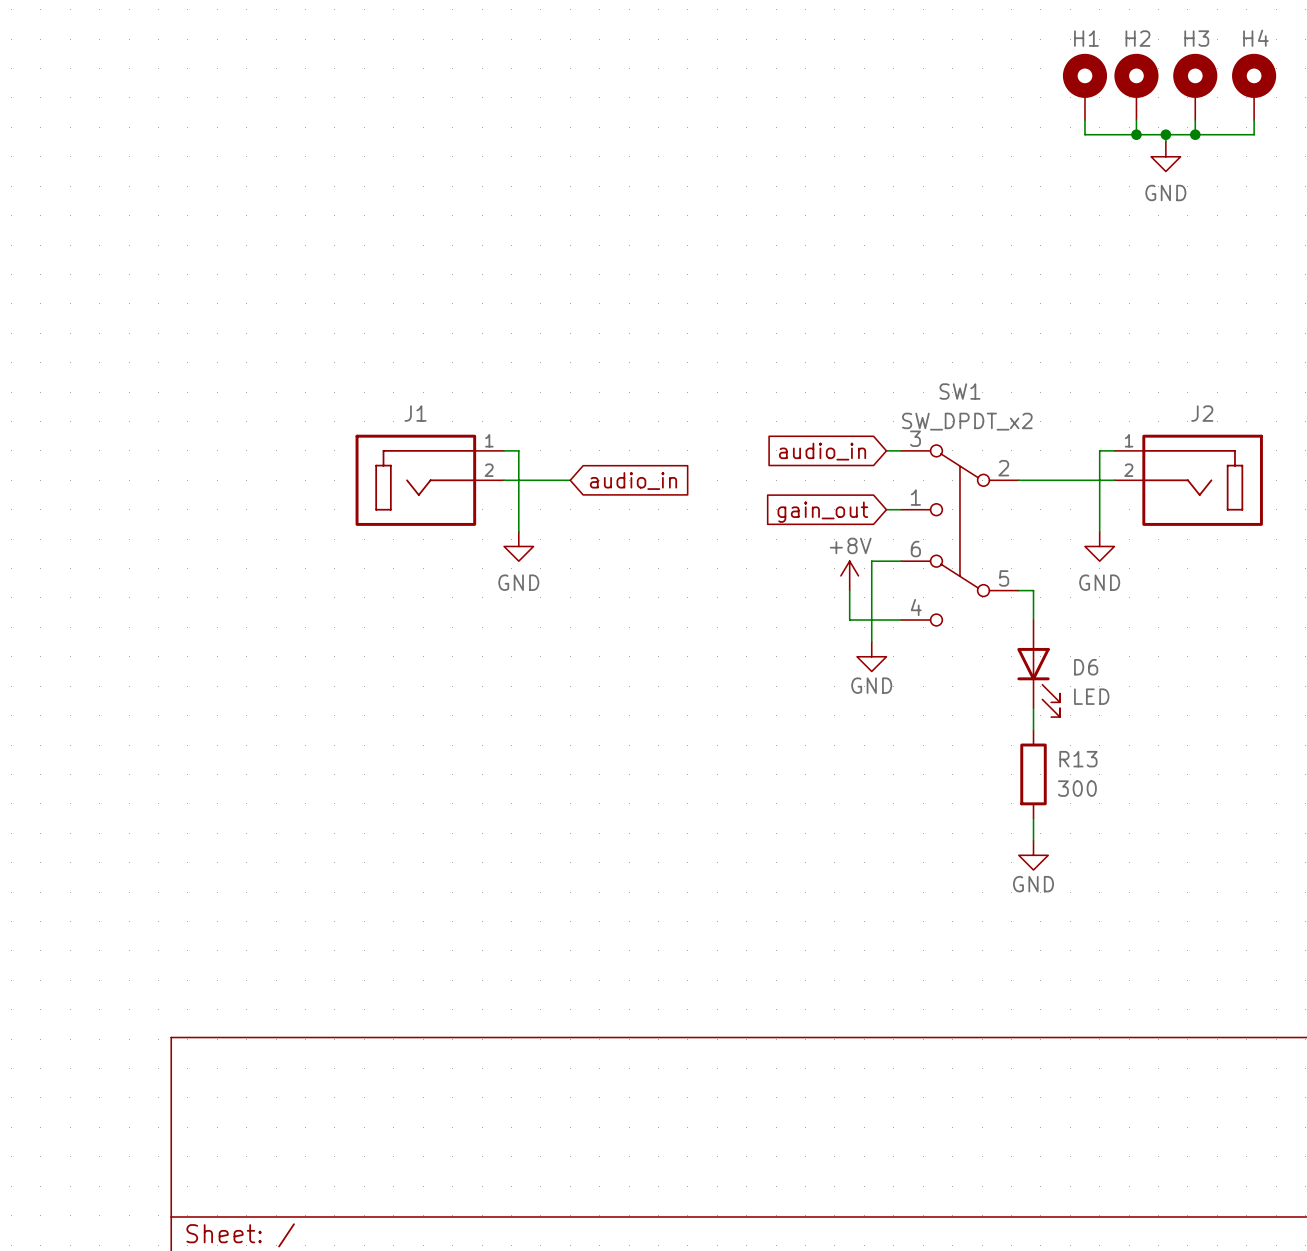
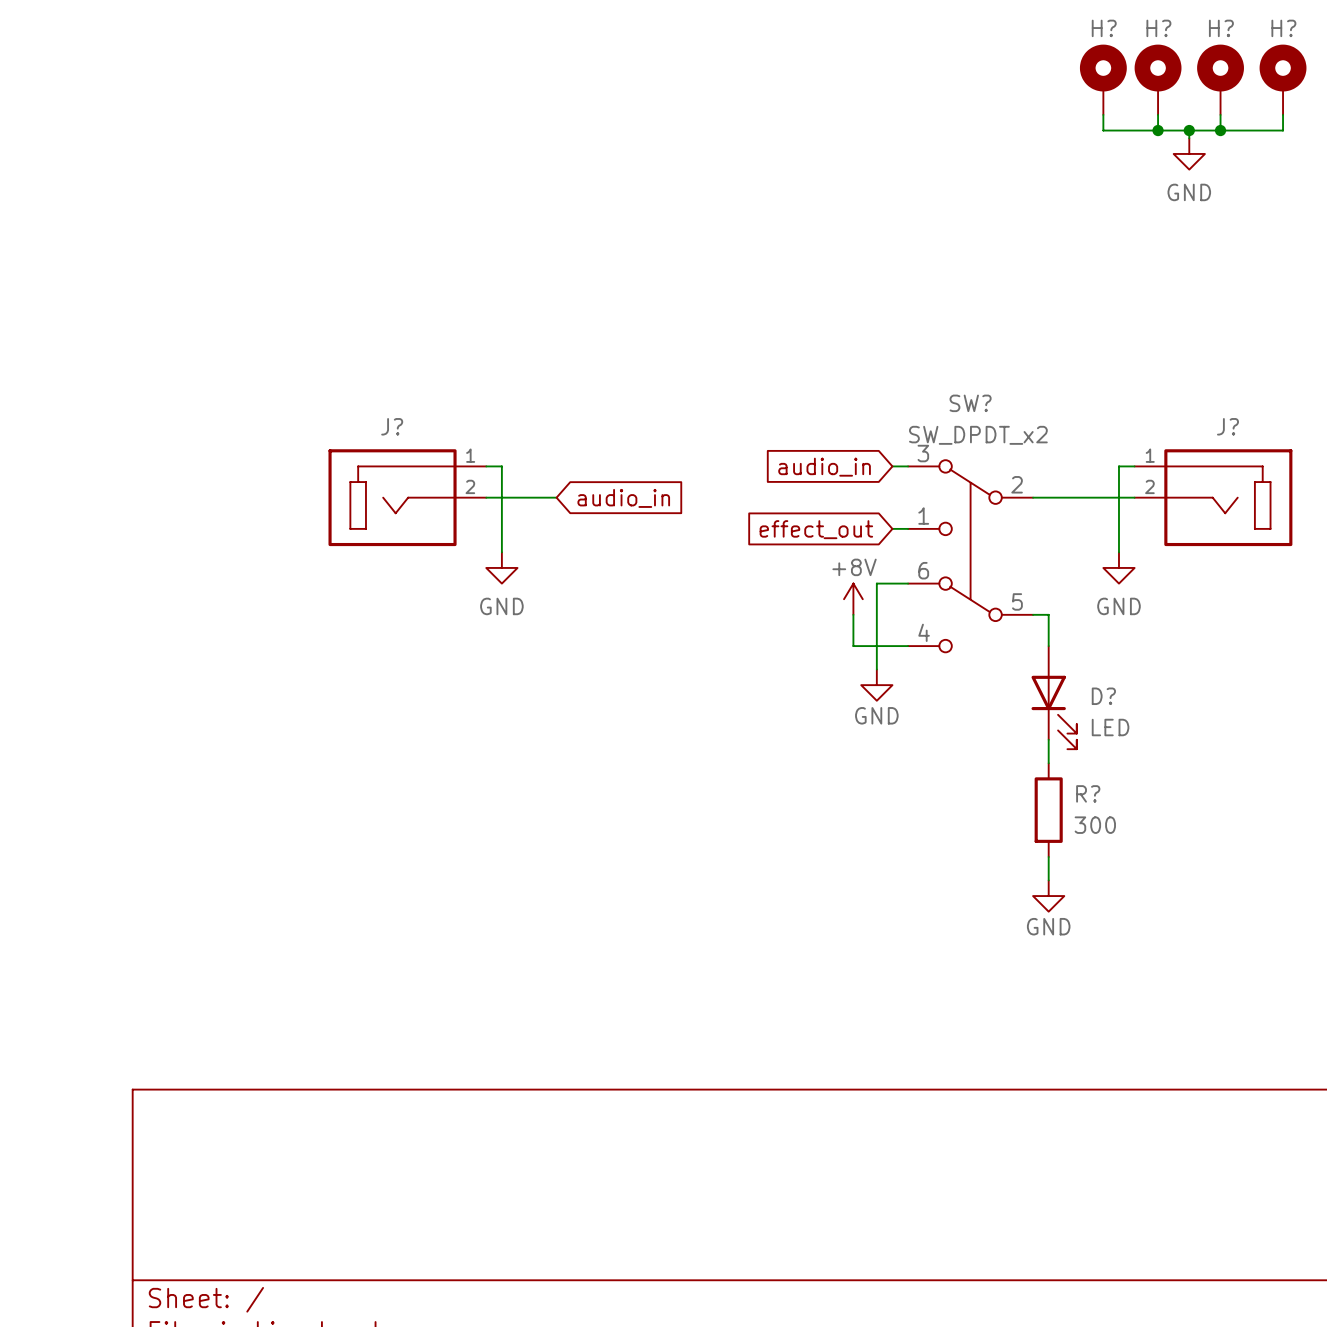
H1 name: H1 (1086, 38) -> H? (1104, 28)
H2 name: H2 (1137, 38) -> H? (1158, 28)
H3 name: H3 (1196, 38) -> H? (1221, 28)
H4 name: H4 (1255, 38) -> H? (1283, 28)
SW1 name: SW1 (959, 391) -> SW? (970, 403)
J1 name: J1 (415, 413) -> J? (392, 426)
J2 name: J2 (1202, 413) -> J? (1227, 426)
global label: gain_out (822, 512) -> effect_out (816, 529)
D6 name: D6 (1086, 667) -> D? (1103, 696)
R13 name: R13 (1078, 759) -> R? (1088, 793)

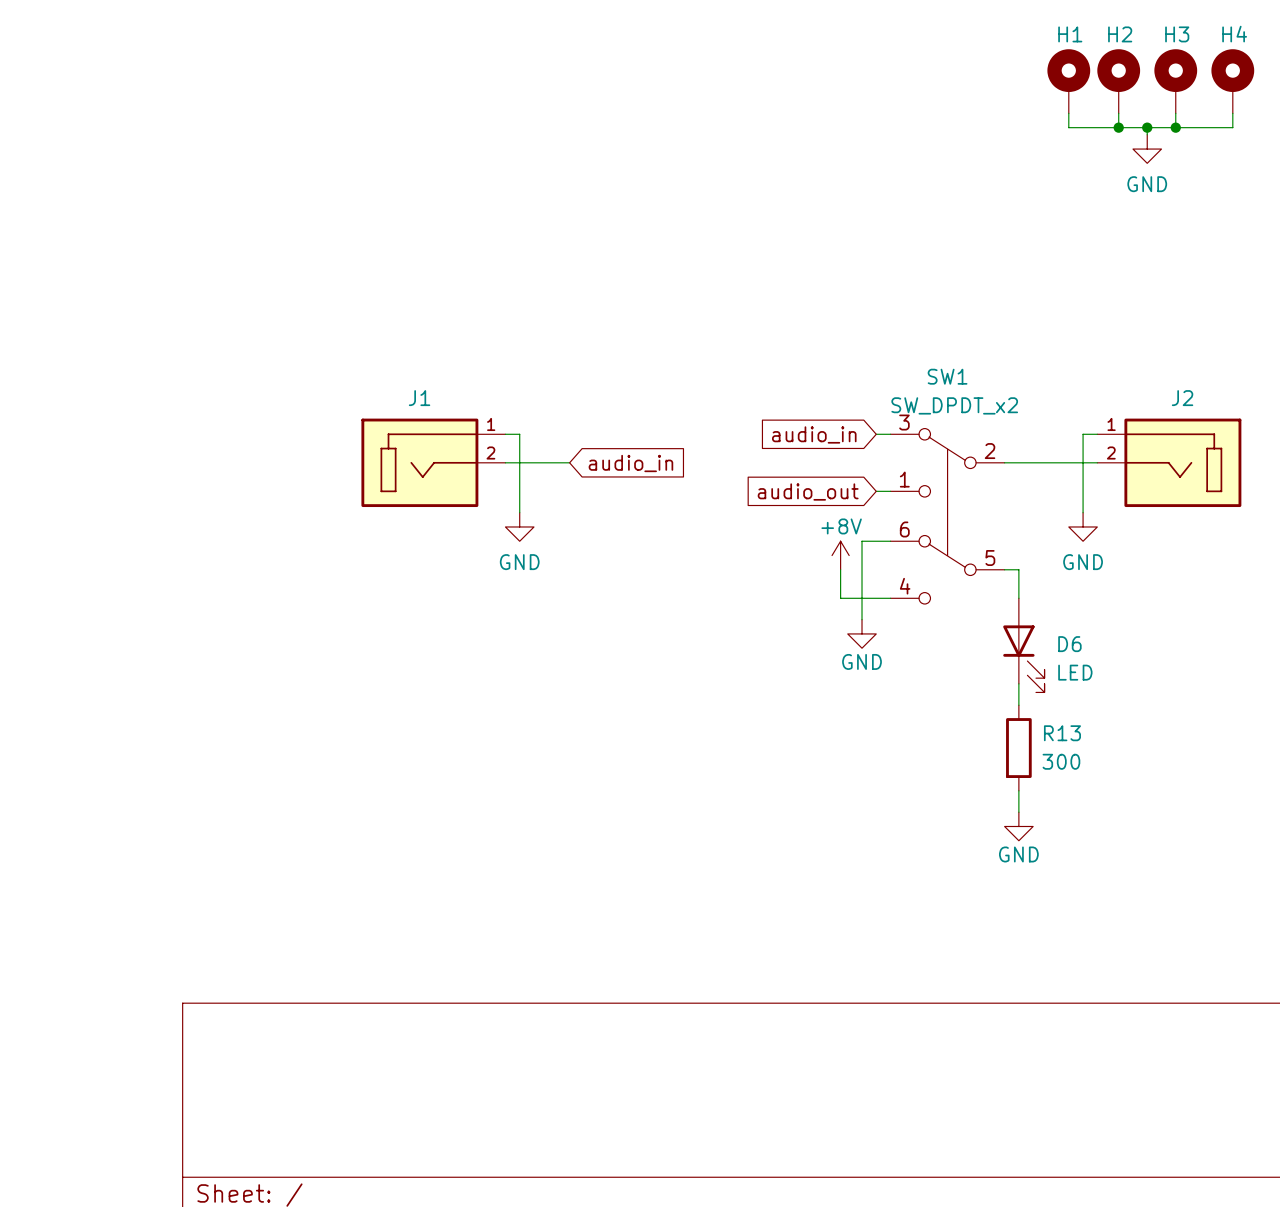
H? name: H? (1104, 28) -> H1 (1070, 34)
H? name: H? (1158, 28) -> H2 (1120, 34)
H? name: H? (1221, 28) -> H3 (1177, 34)
H? name: H? (1283, 28) -> H4 (1234, 34)
SW? name: SW? (970, 403) -> SW1 (947, 376)
J? name: J? (392, 426) -> J1 (419, 398)
J? name: J? (1227, 426) -> J2 (1182, 398)
global label: effect_out (816, 529) -> audio_out (808, 492)
D? name: D? (1103, 696) -> D6 (1069, 644)
R? name: R? (1088, 793) -> R13 (1062, 733)

